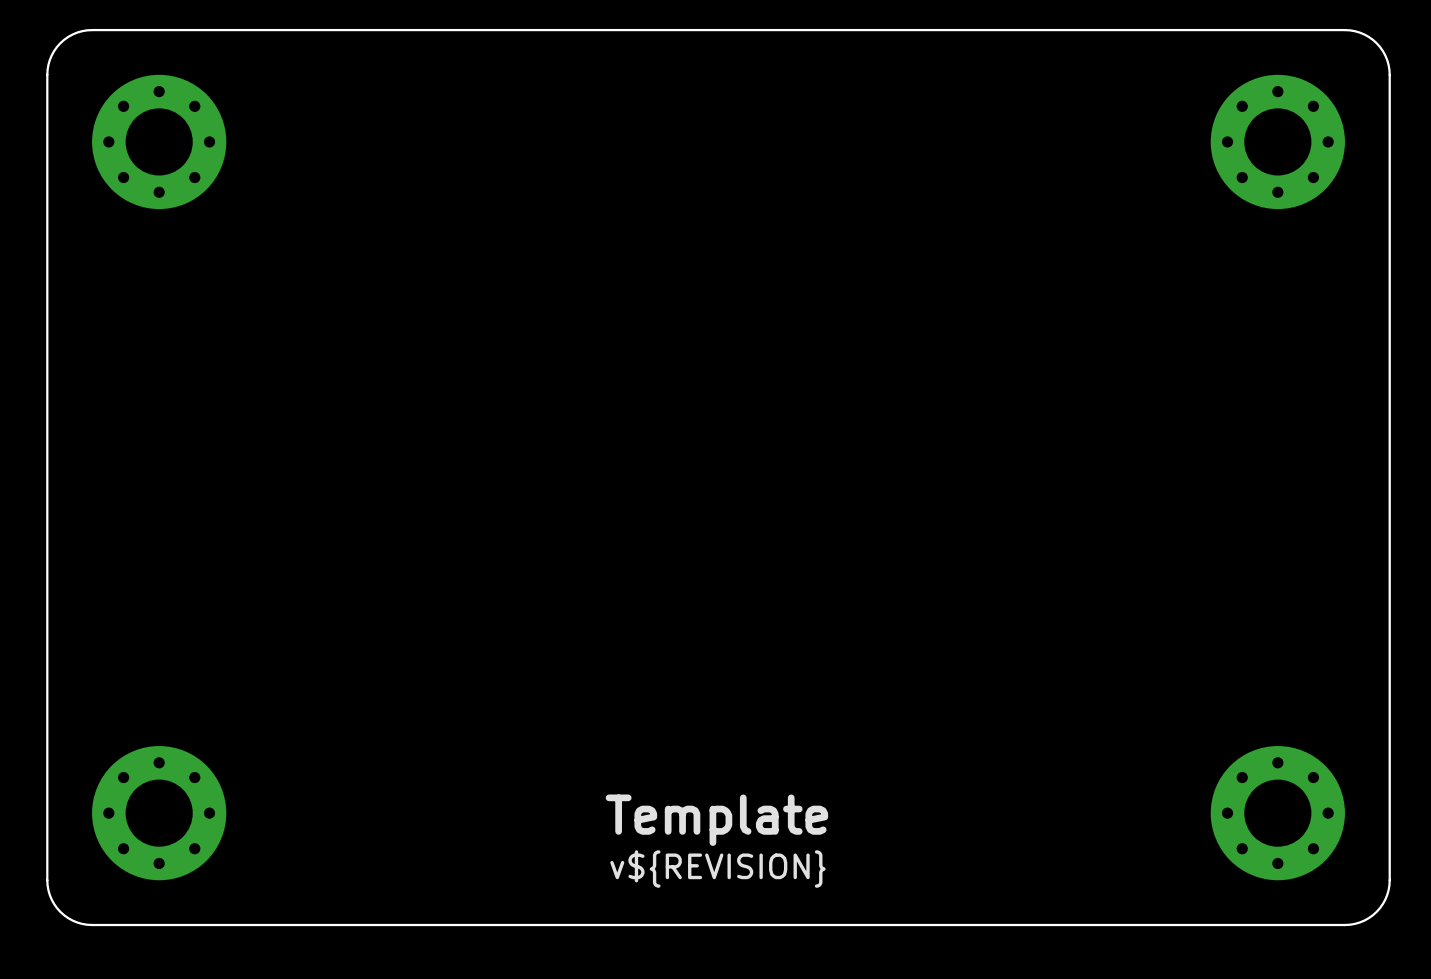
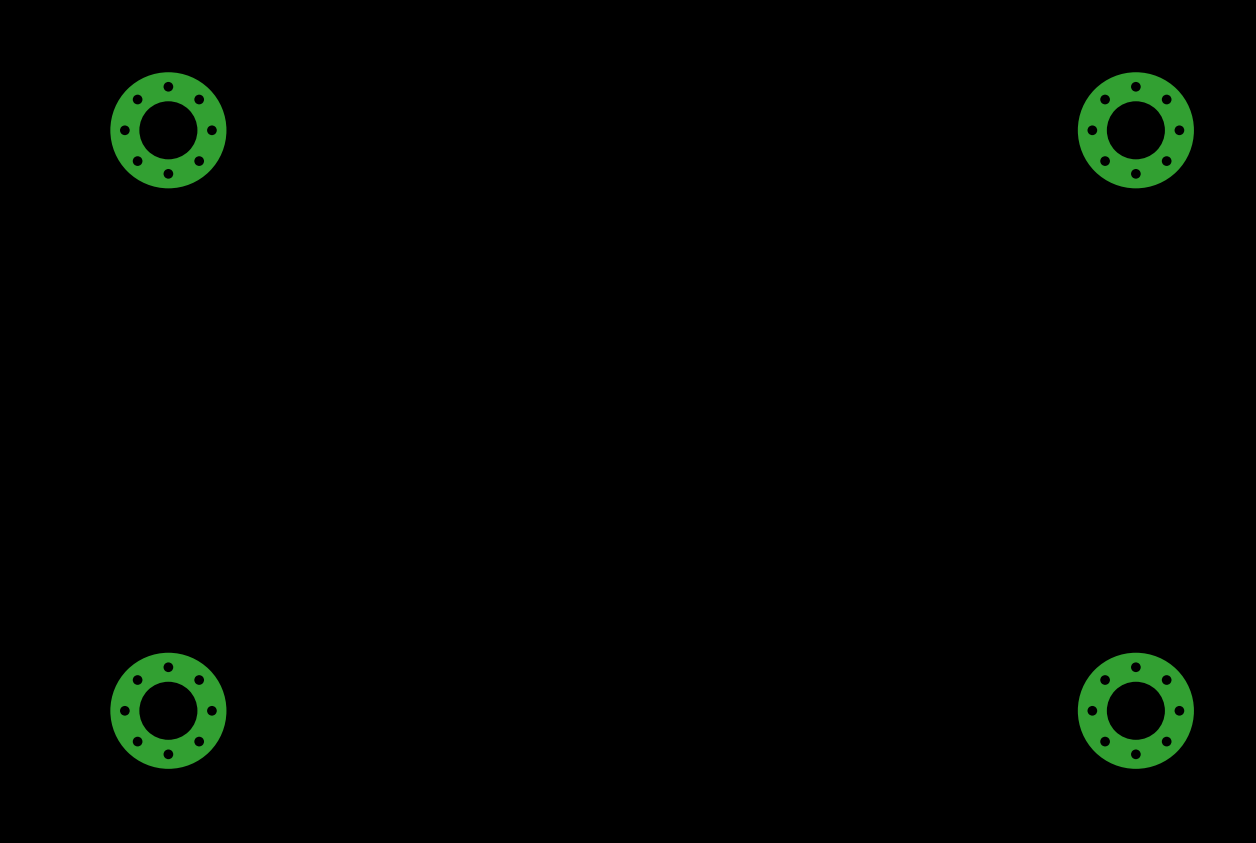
board edge: (92, 30) (1344, 30) (1354, 31) (1368, 36) (1382, 51) (1387, 60) (1389, 74) (1389, 880) (1388, 890) (1382, 904) (1372, 915) (1364, 920) (1344, 925) (92, 925) (77, 922) (68, 918) (54, 904) (49, 895) (47, 880) (47, 74) (49, 60) (60, 43) (72, 34) (92, 30) -> none
text: Template (716, 820) -> none
text: v${REVISION} (717, 869) -> none

